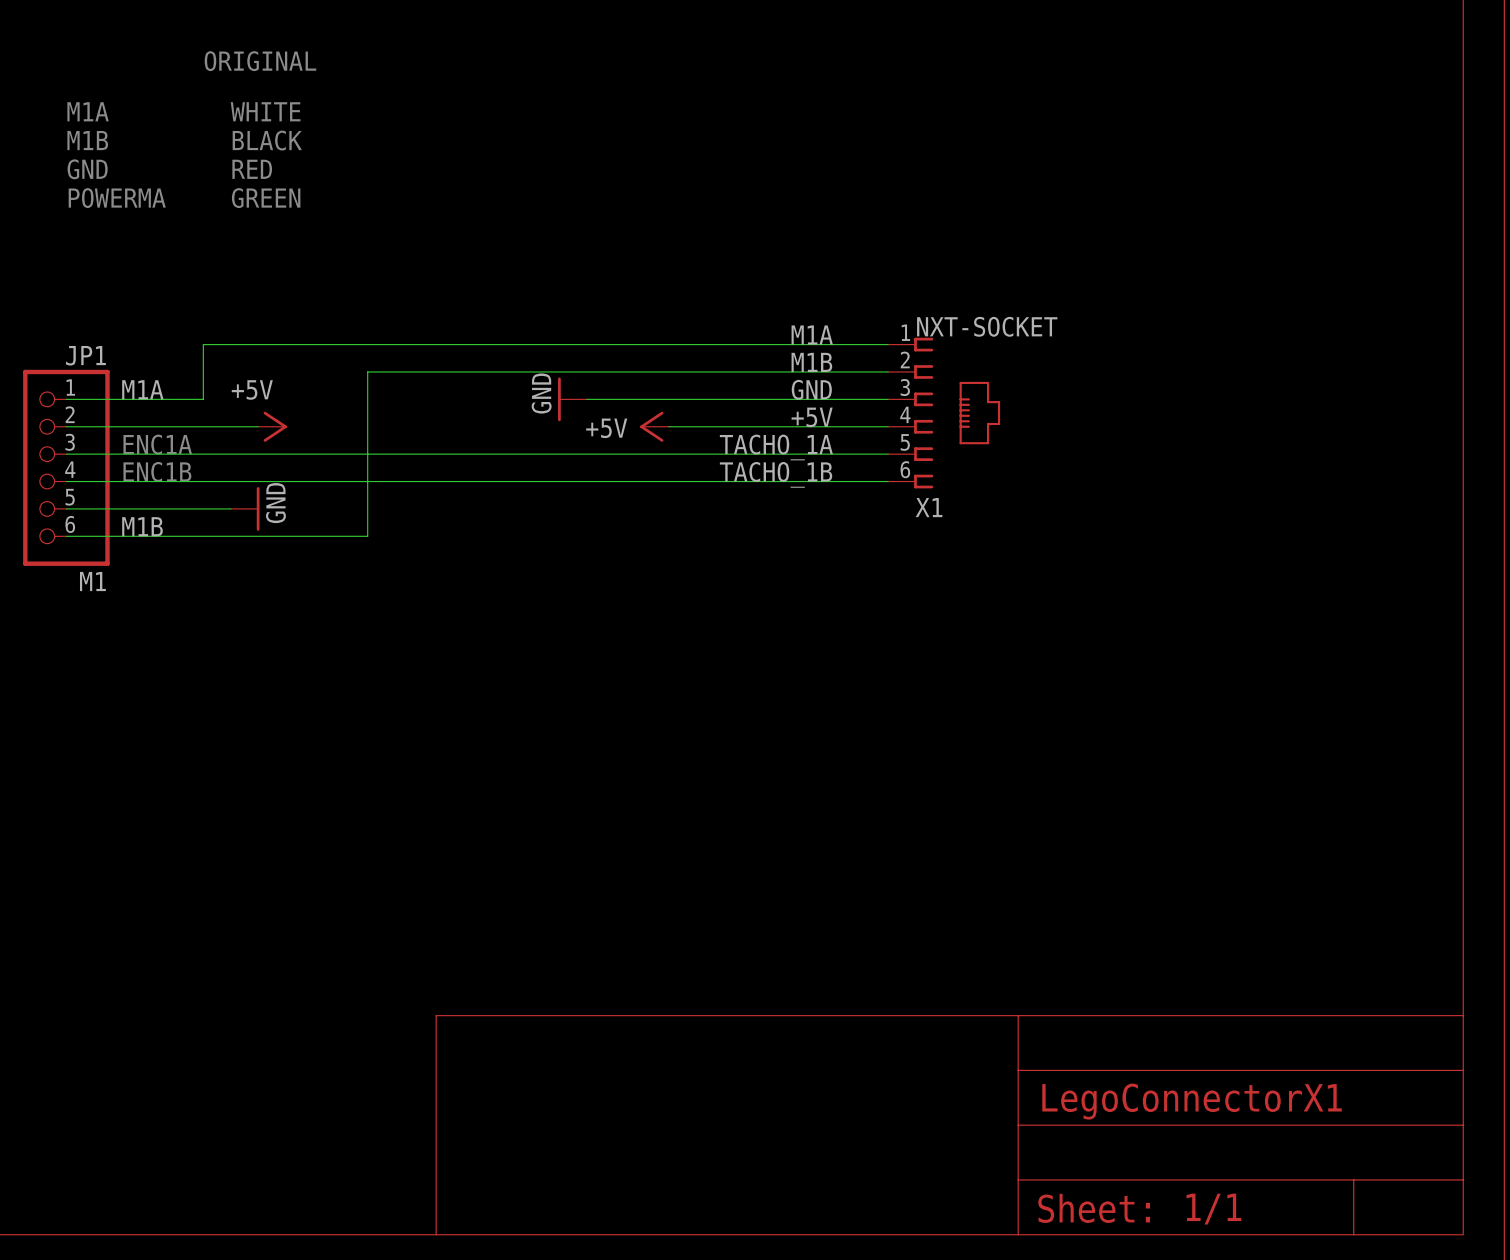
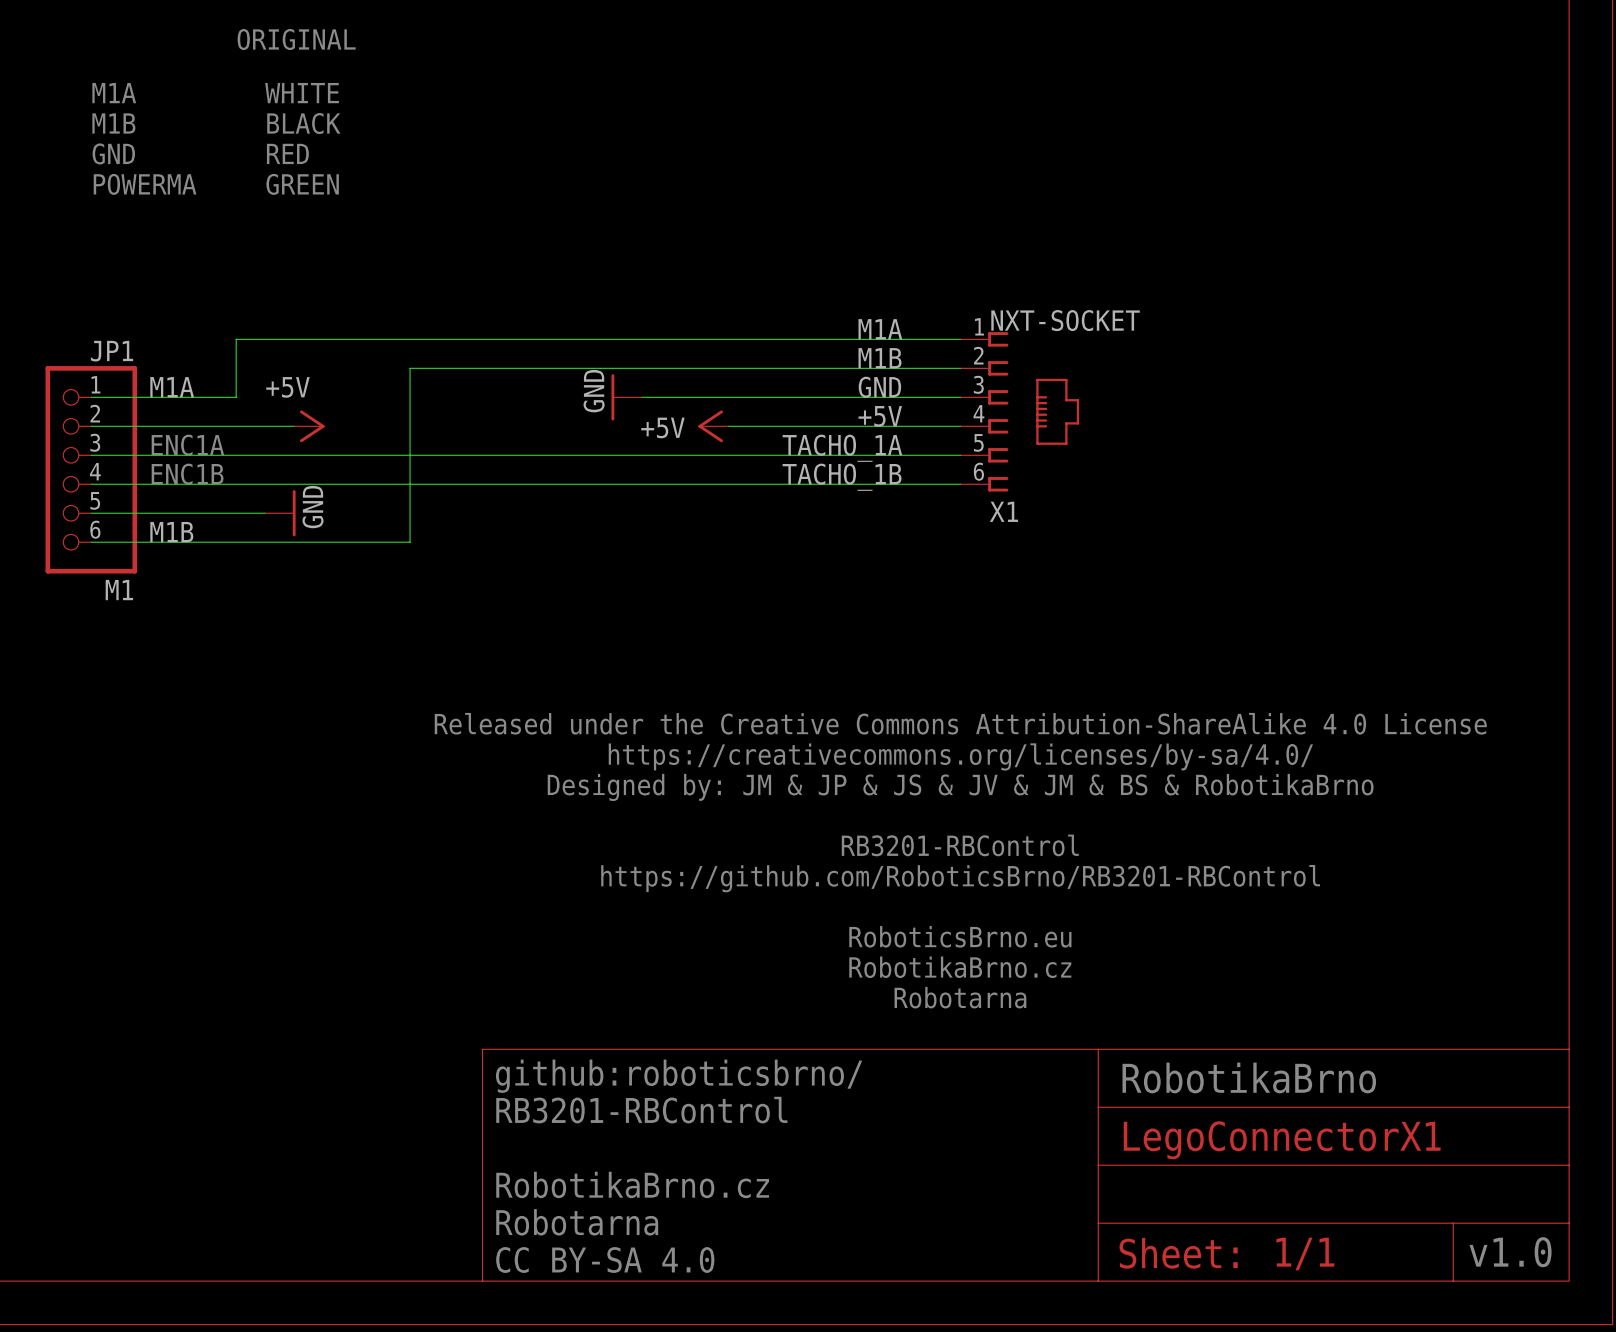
text: none -> Released under the Creative Commons Attribution-ShareAlike 4.0 License (960, 723)
text: none -> https://creativecommons.org/licenses/by-sa/4.0/ (960, 756)
text: none -> Designed by: JM & JP & JS & JV & JM & BS & RobotikaBrno (960, 787)
text: none -> RB3201-RBControl (960, 845)
text: none -> https://github.com/RoboticsBrno/RB3201-RBControl (960, 878)
text: none -> RoboticsBrno.eu (960, 936)
text: none -> RobotikaBrno.cz (960, 967)
text: none -> Robotarna (960, 997)
text: none -> github:roboticsbrno/ (679, 1076)
text: none -> RobotikaBrno (1249, 1077)
text: none -> RB3201-RBControl (641, 1110)
text: none -> RobotikaBrno.cz (632, 1184)
text: none -> Robotarna (577, 1222)
text: none -> v1.0 (1510, 1252)
text: none -> CC BY-SA 4.0 (605, 1260)

